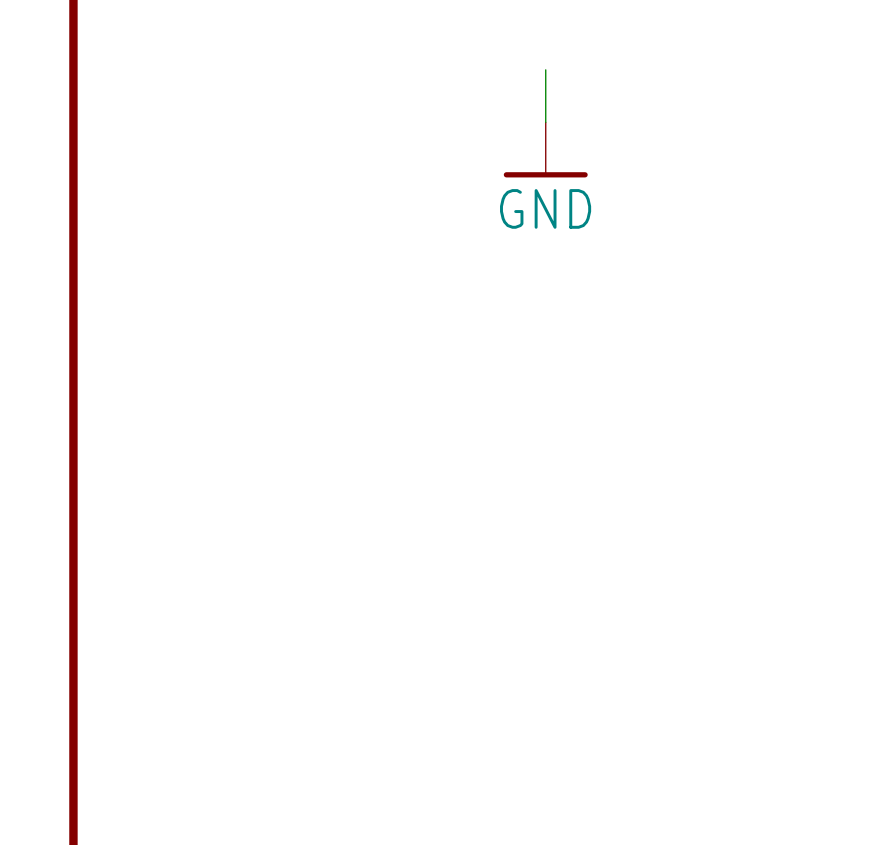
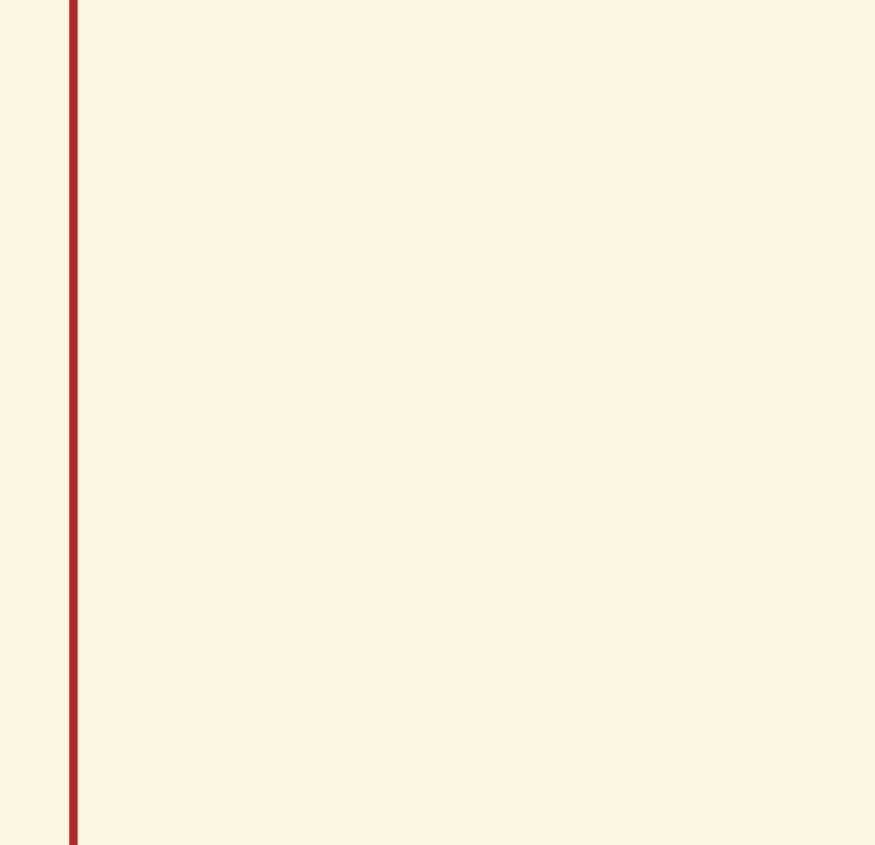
wire: (545, 69) (545, 122) -> none
power symbol: GND (545, 149) -> none

